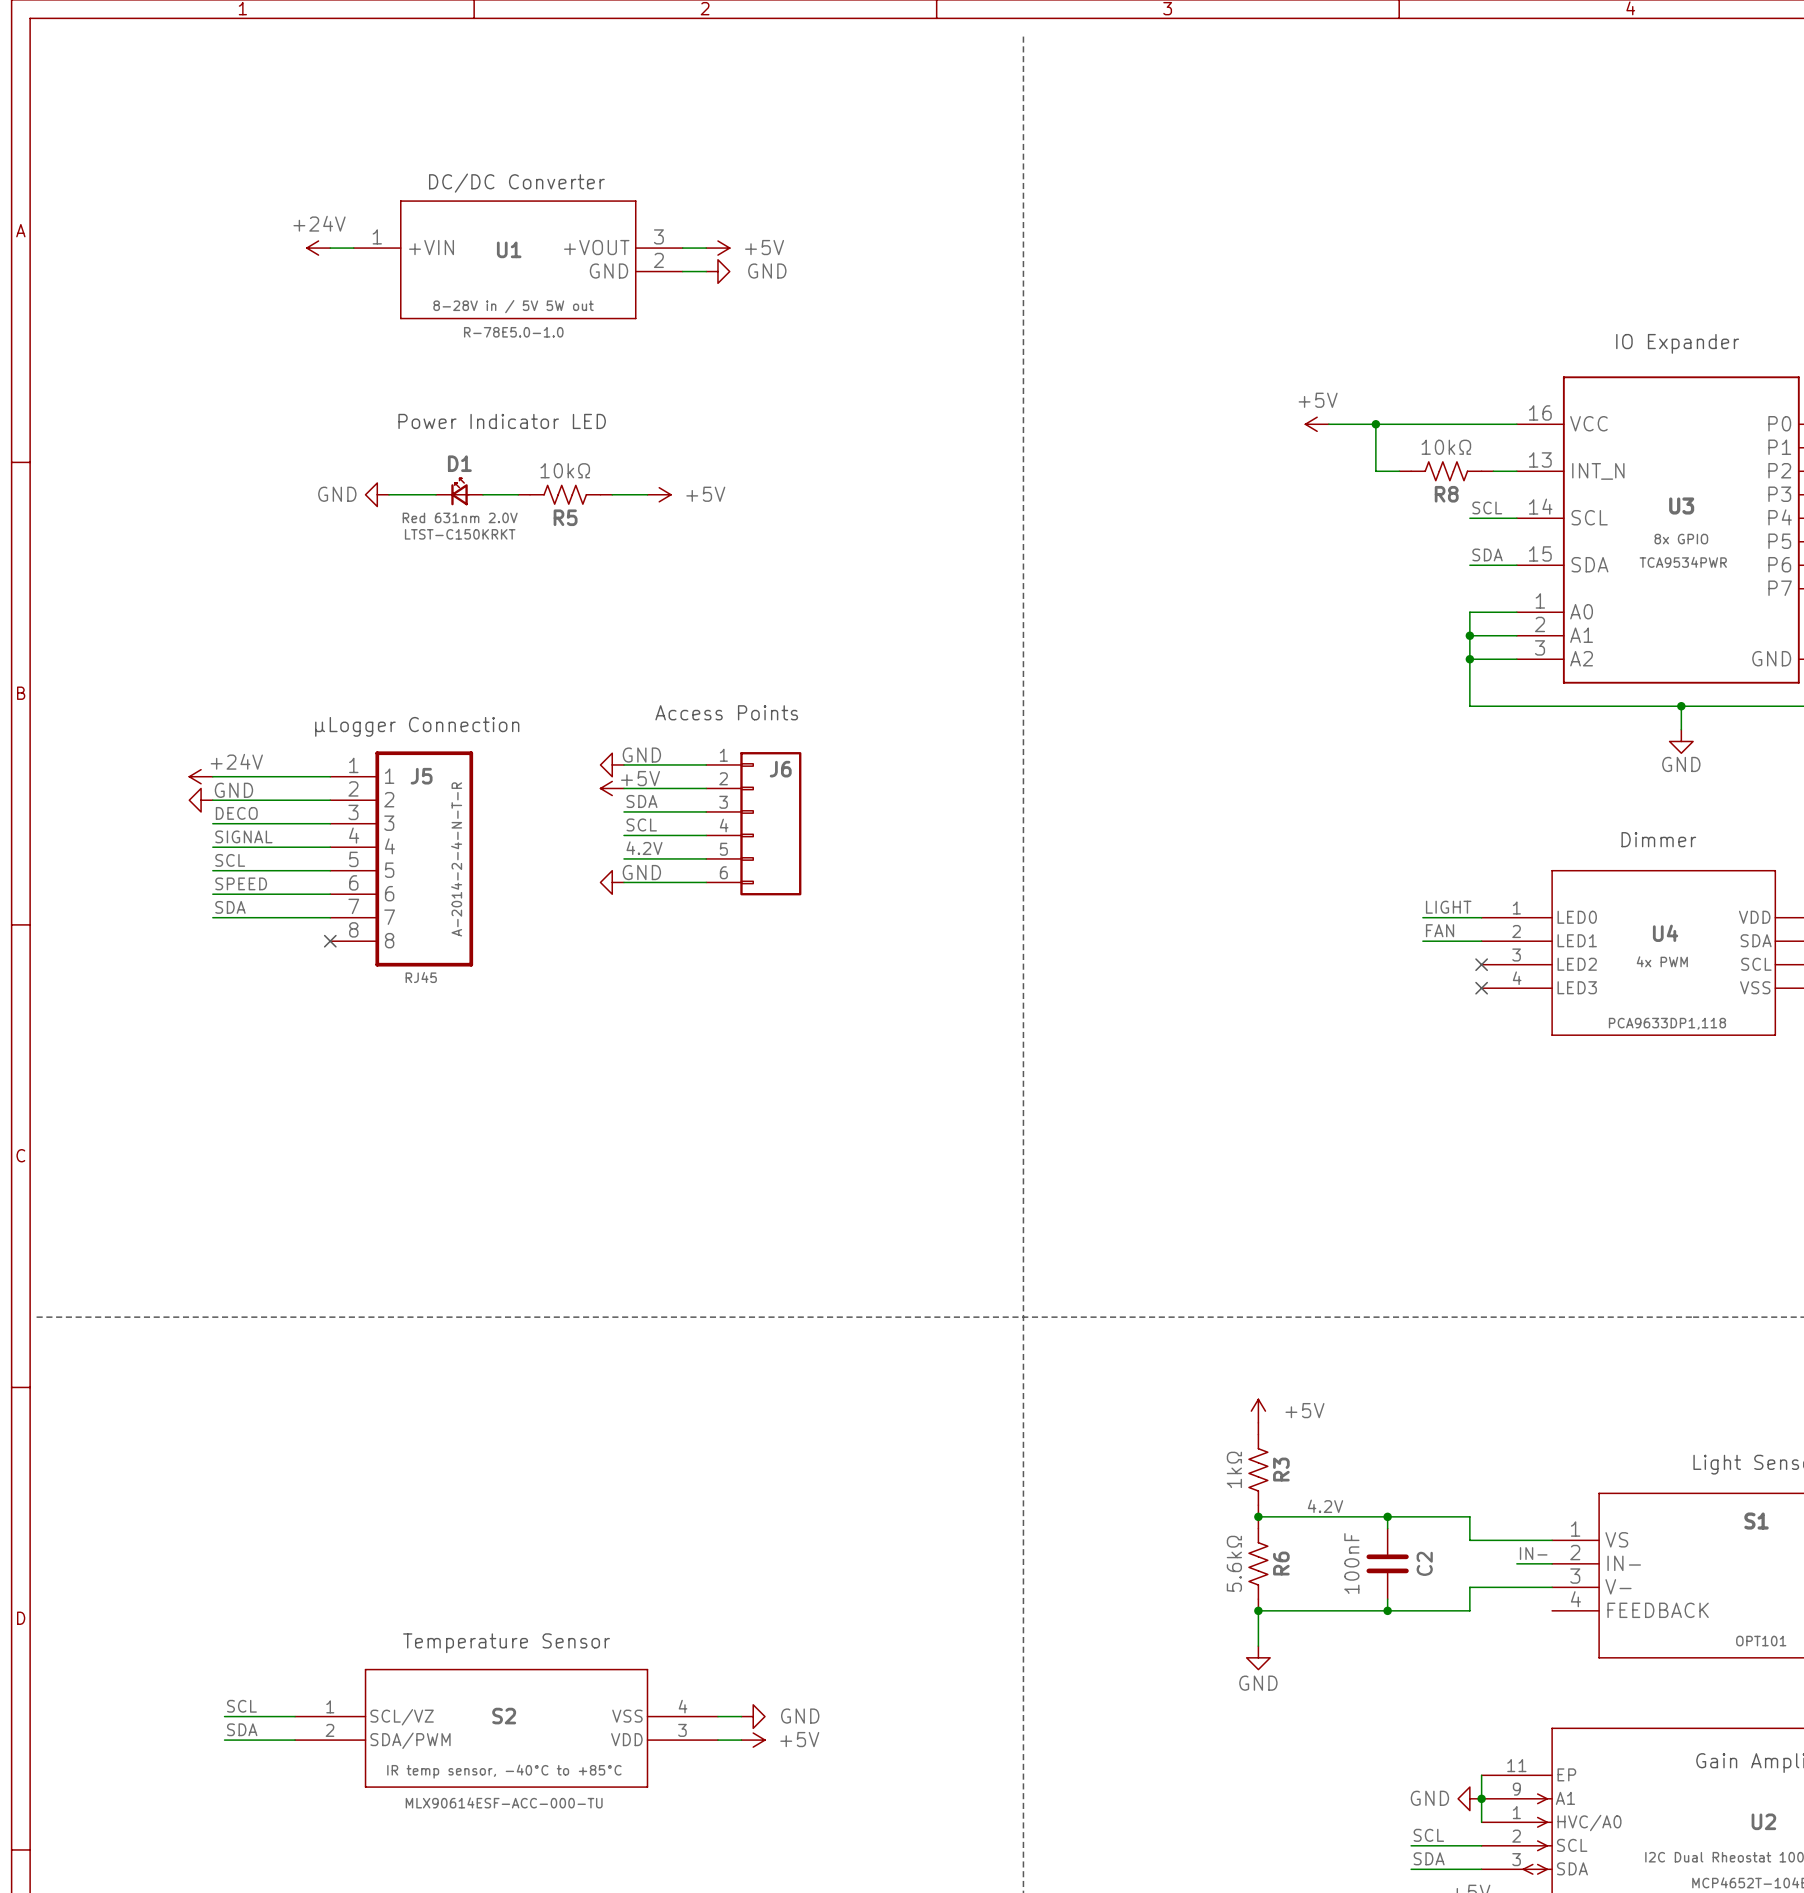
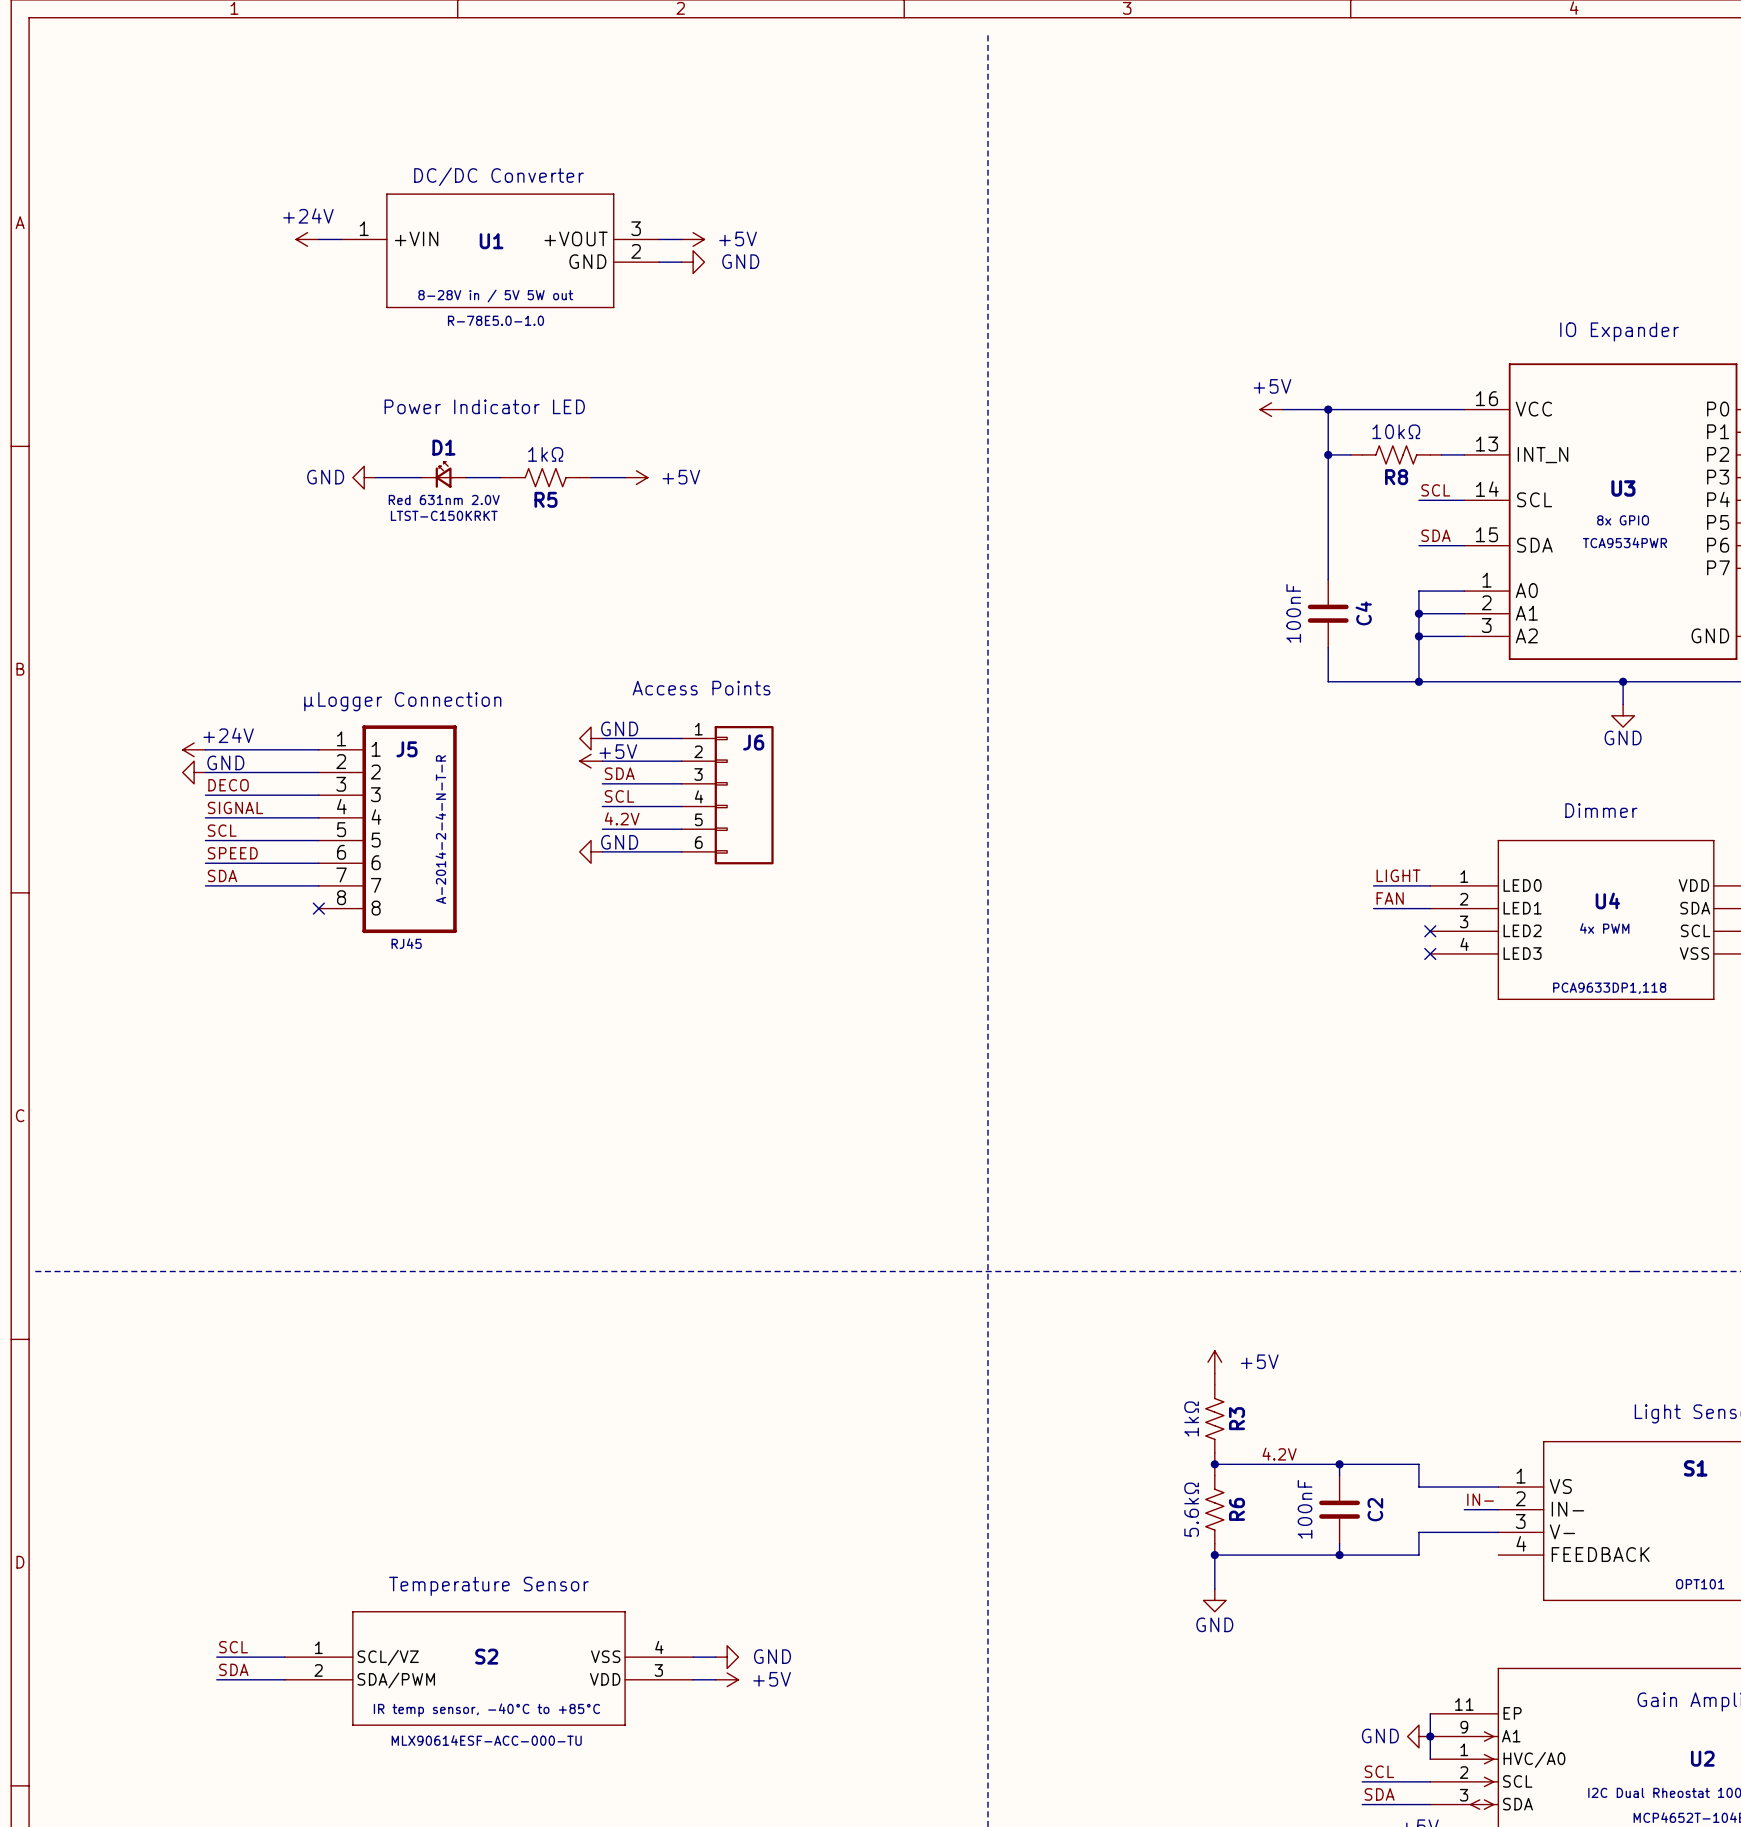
R5 value: 10kΩ (565, 470) -> 1kΩ (545, 454)
wire: none -> (1328, 454) (1328, 579)
junction: none -> (1328, 454)
C4: none -> 100nF (1328, 613)
wire: none -> (1328, 647) (1328, 681) (1418, 681)
junction: none -> (1418, 681)

